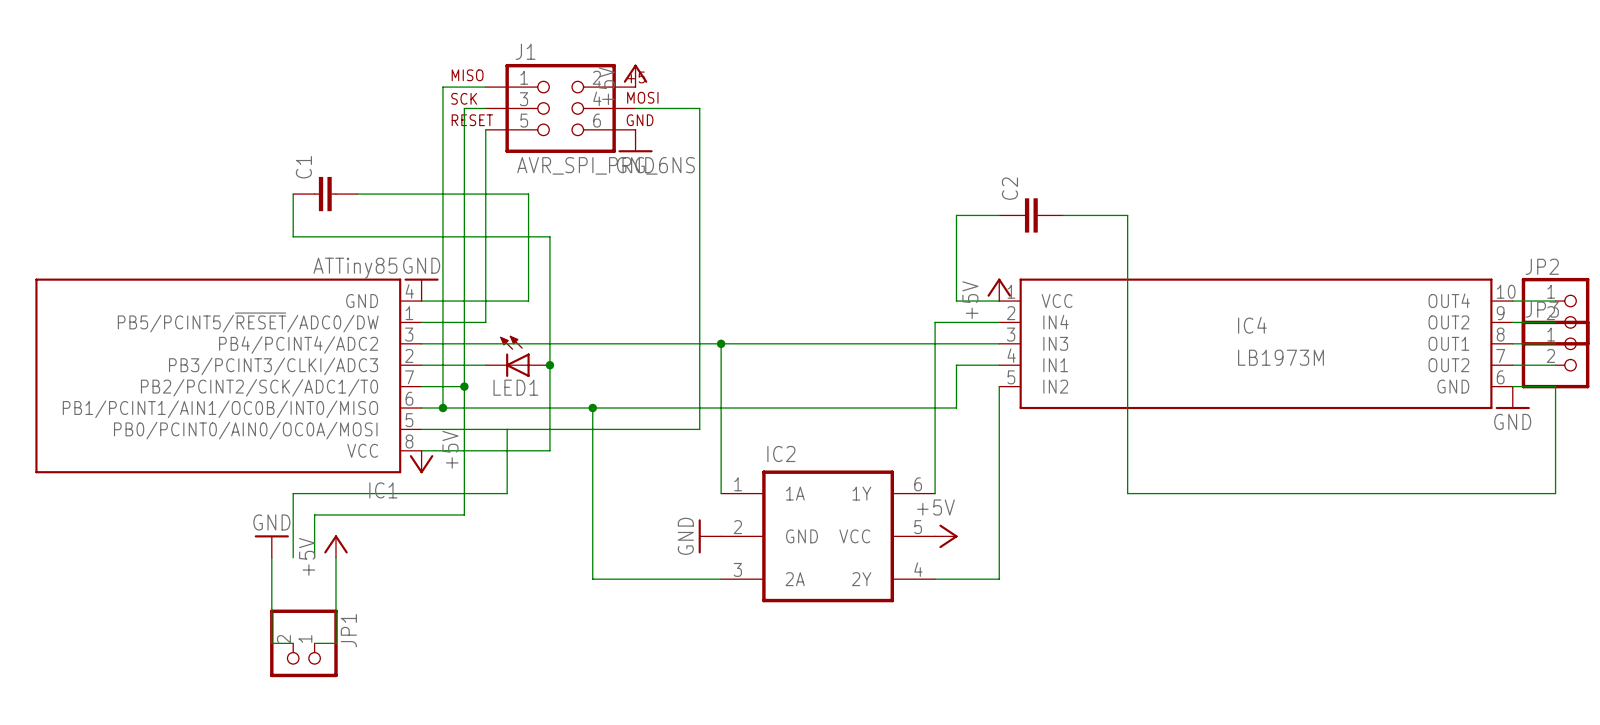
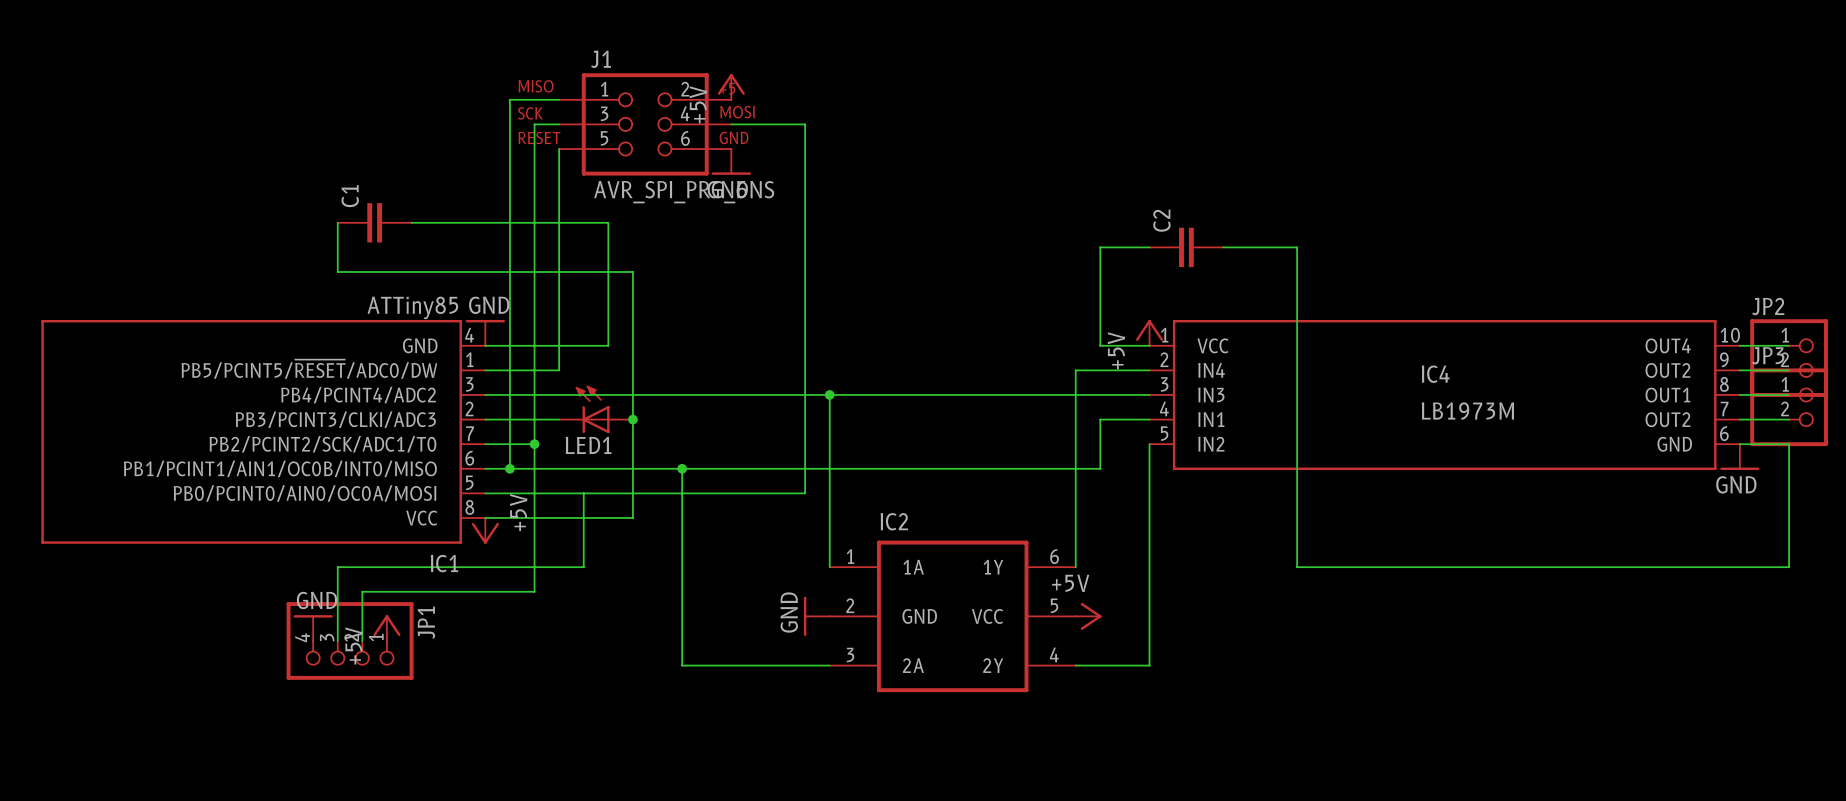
wire: (271, 557) (271, 643) (293, 643) -> none
wire: (335, 557) (335, 643) (314, 643) -> none
JP1 symbol: [270, 609, 338, 678] -> [286, 602, 414, 680]
JP1 name position: JP1 (348, 630) -> JP1 (426, 622)

